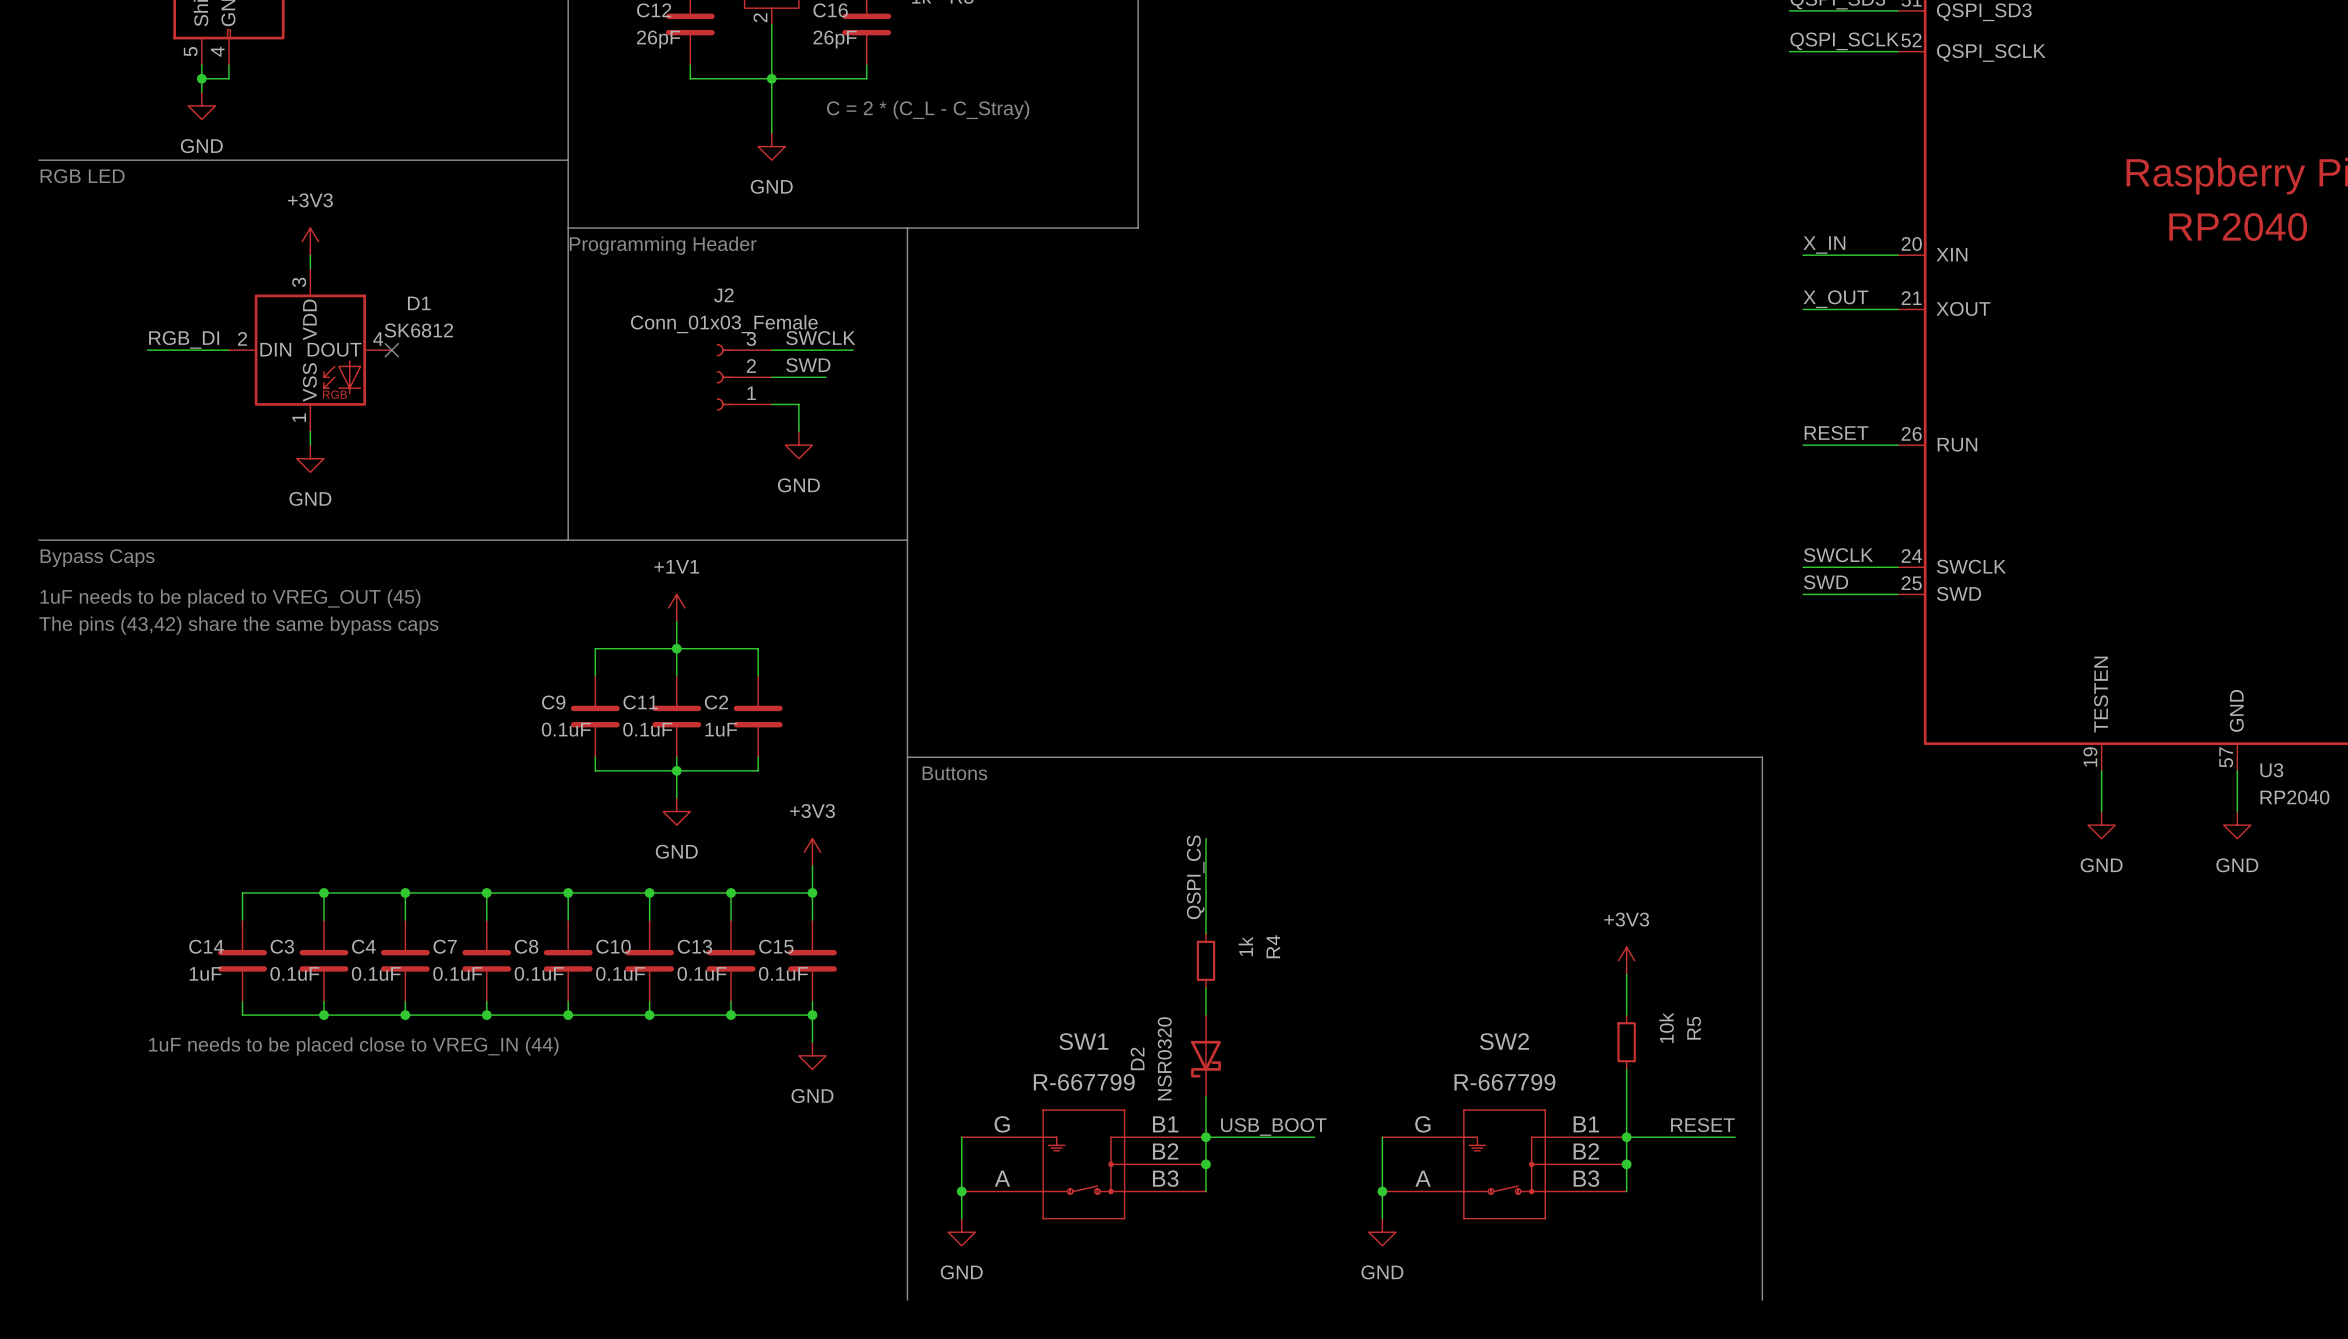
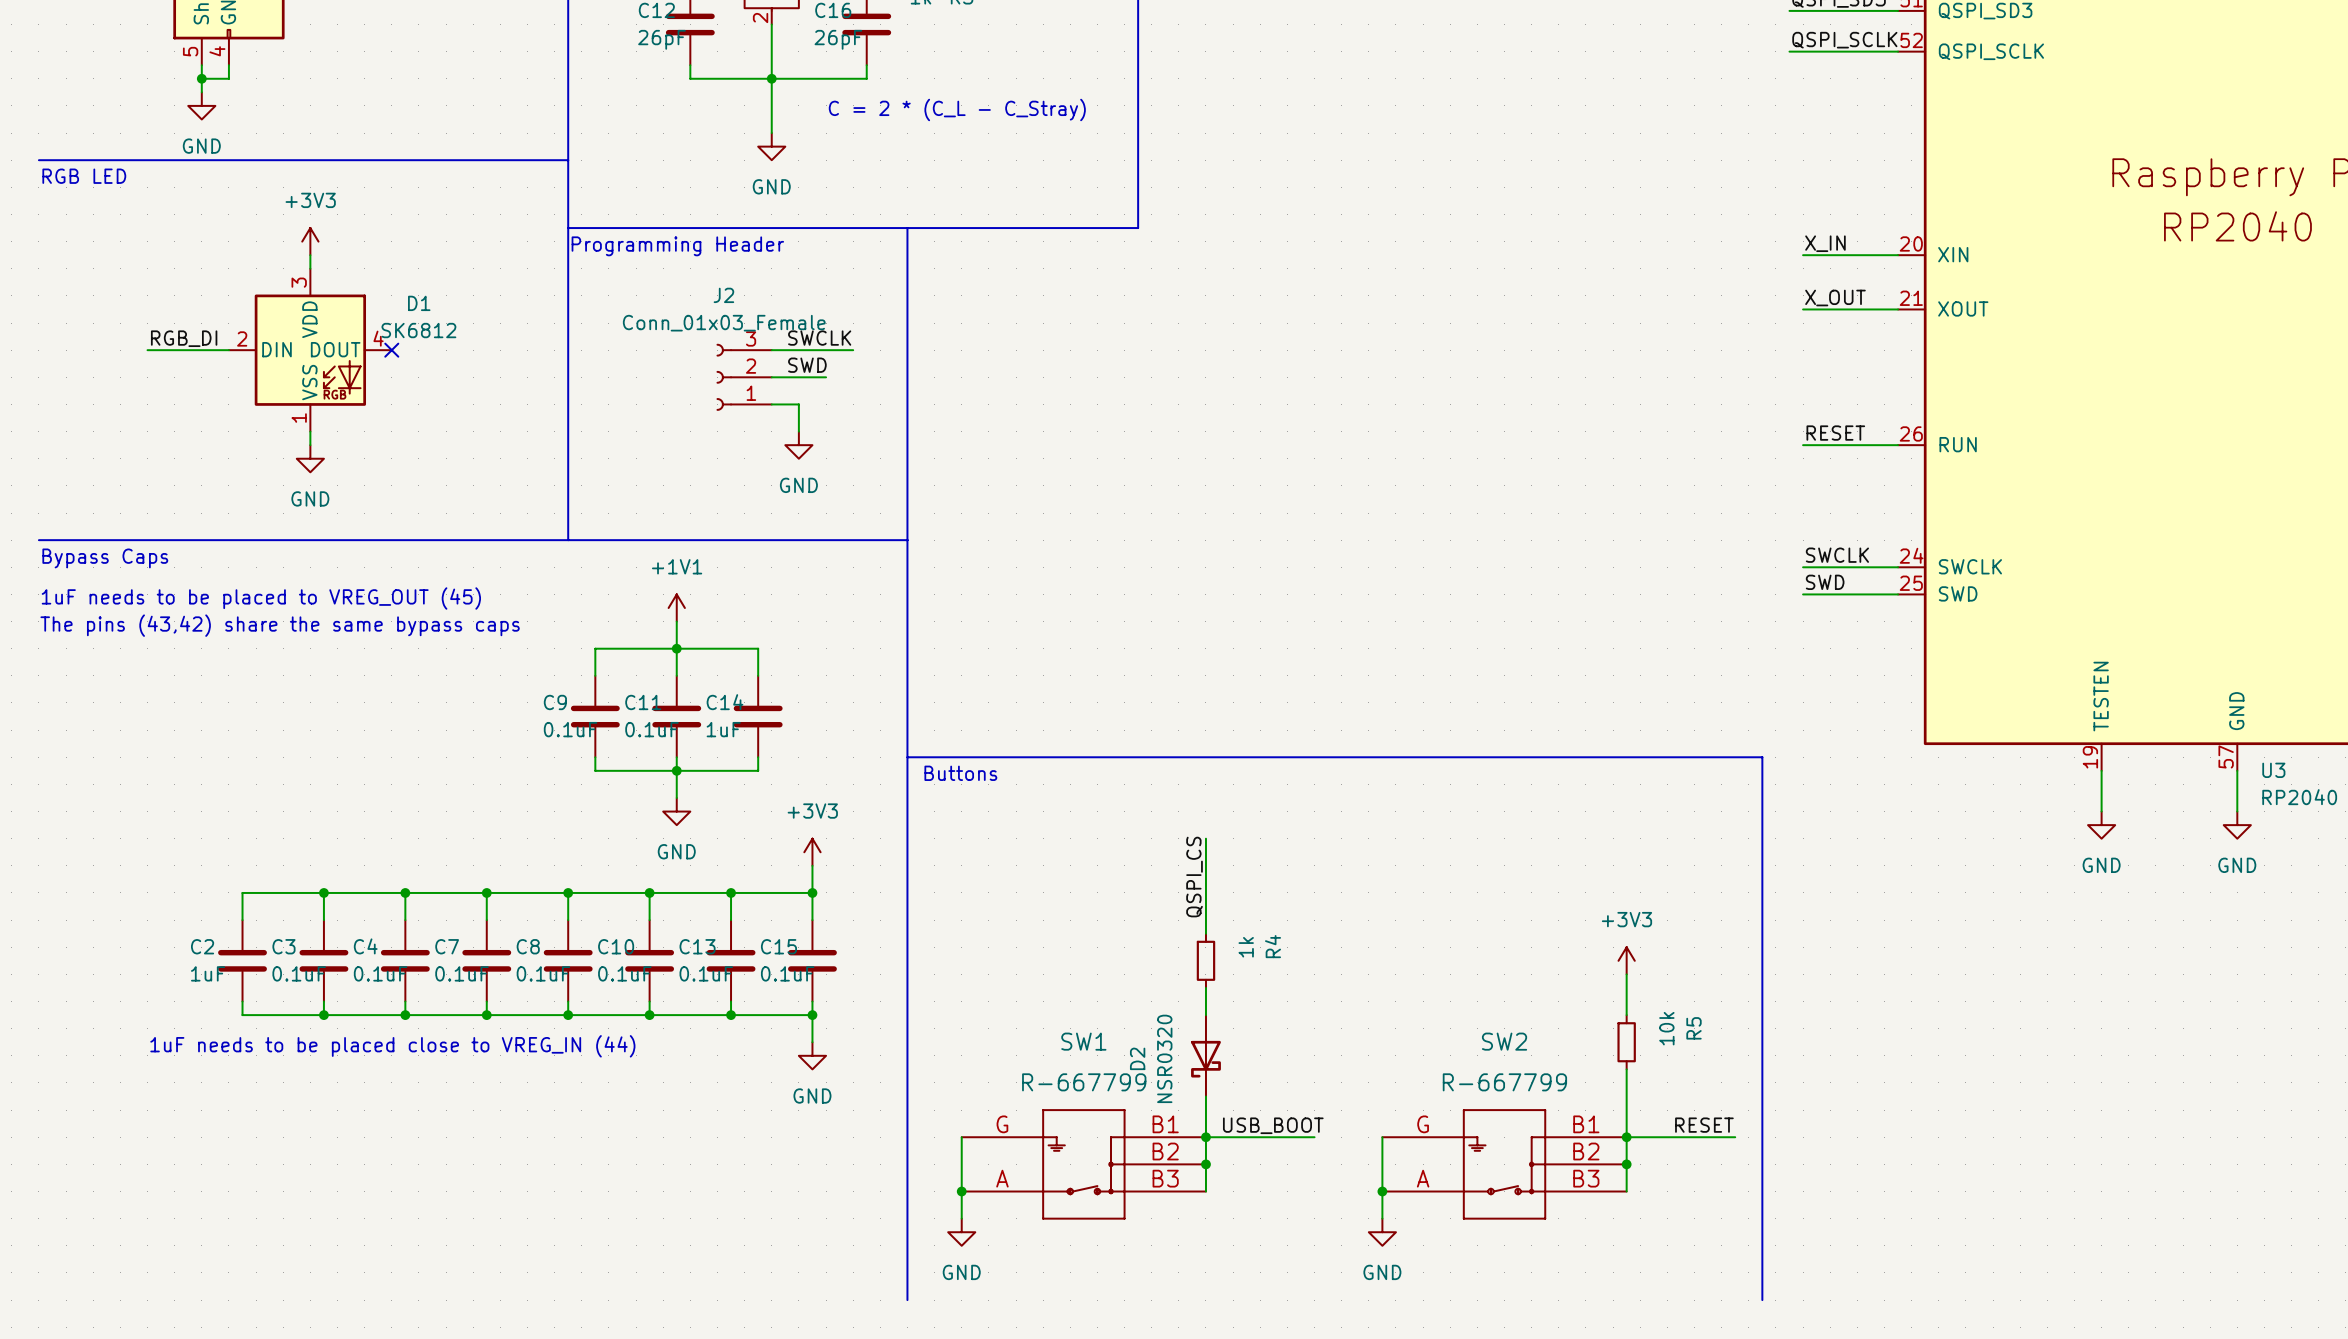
C2 name: C2 (716, 702) -> C14 (725, 702)
C14 name: C14 (206, 946) -> C2 (202, 946)

